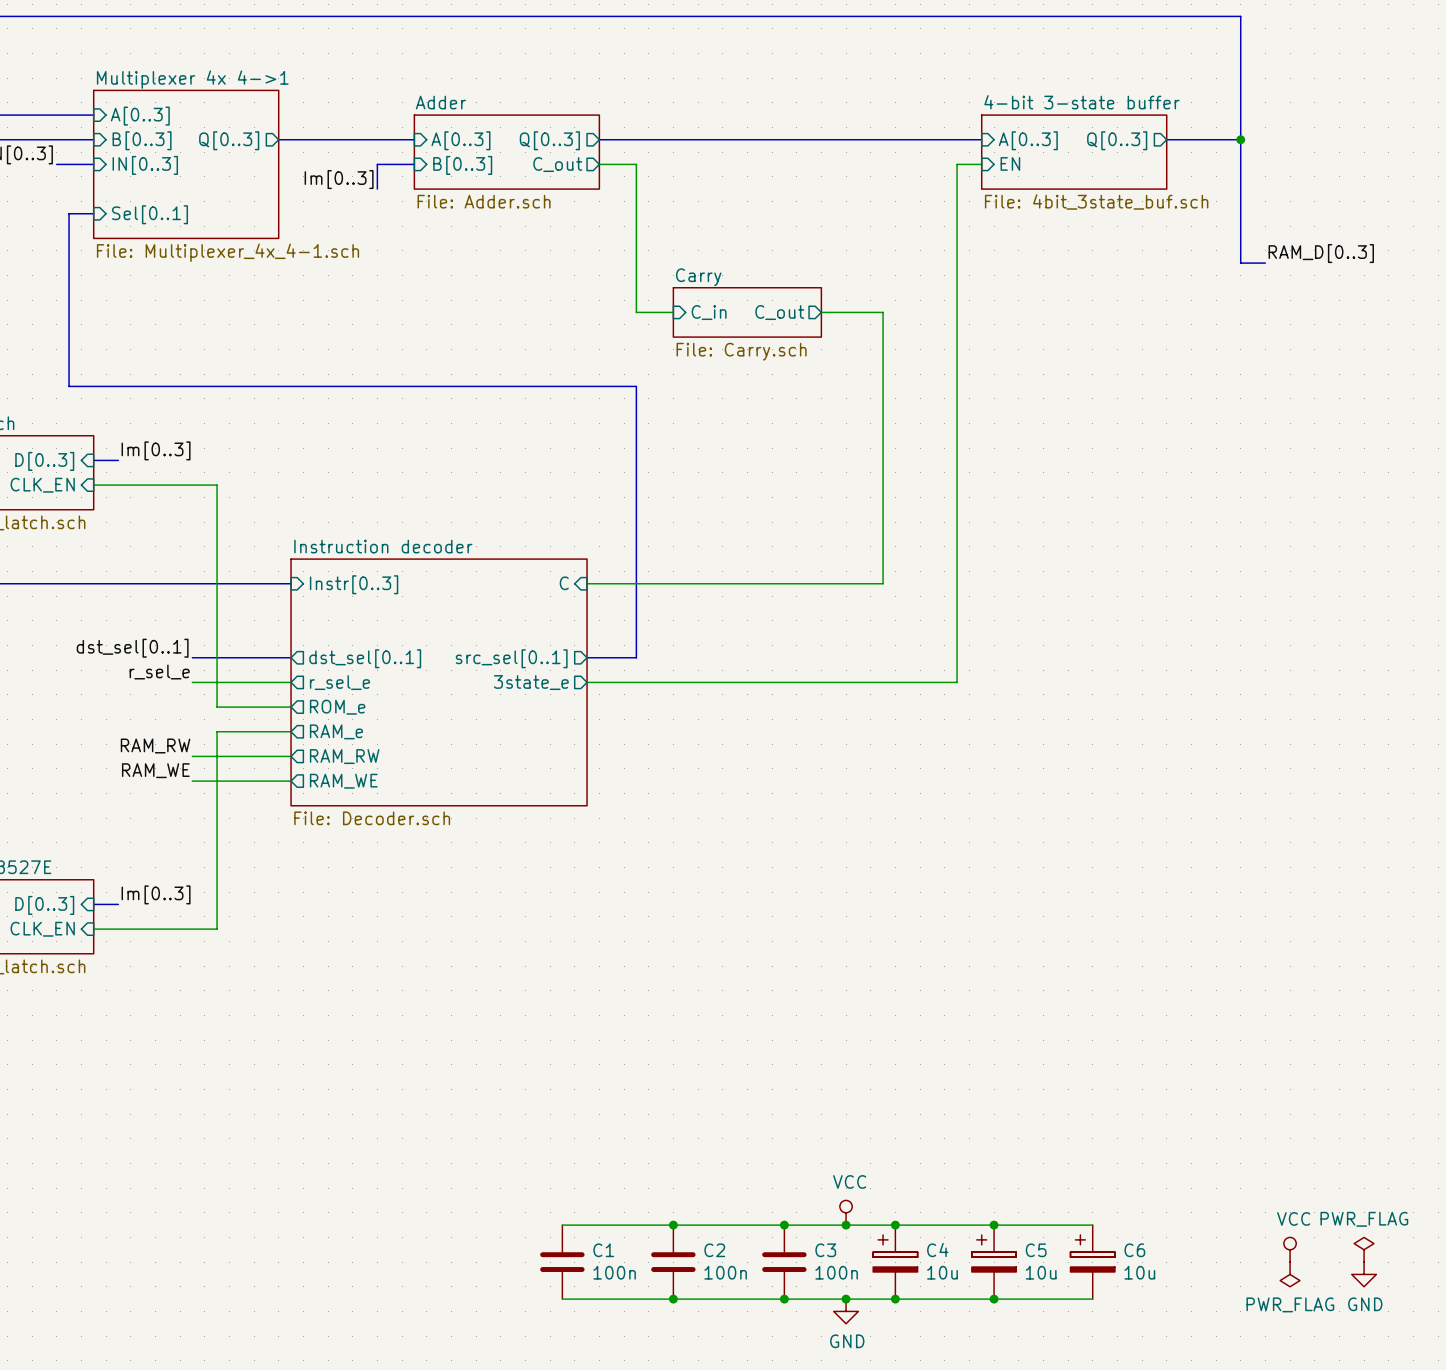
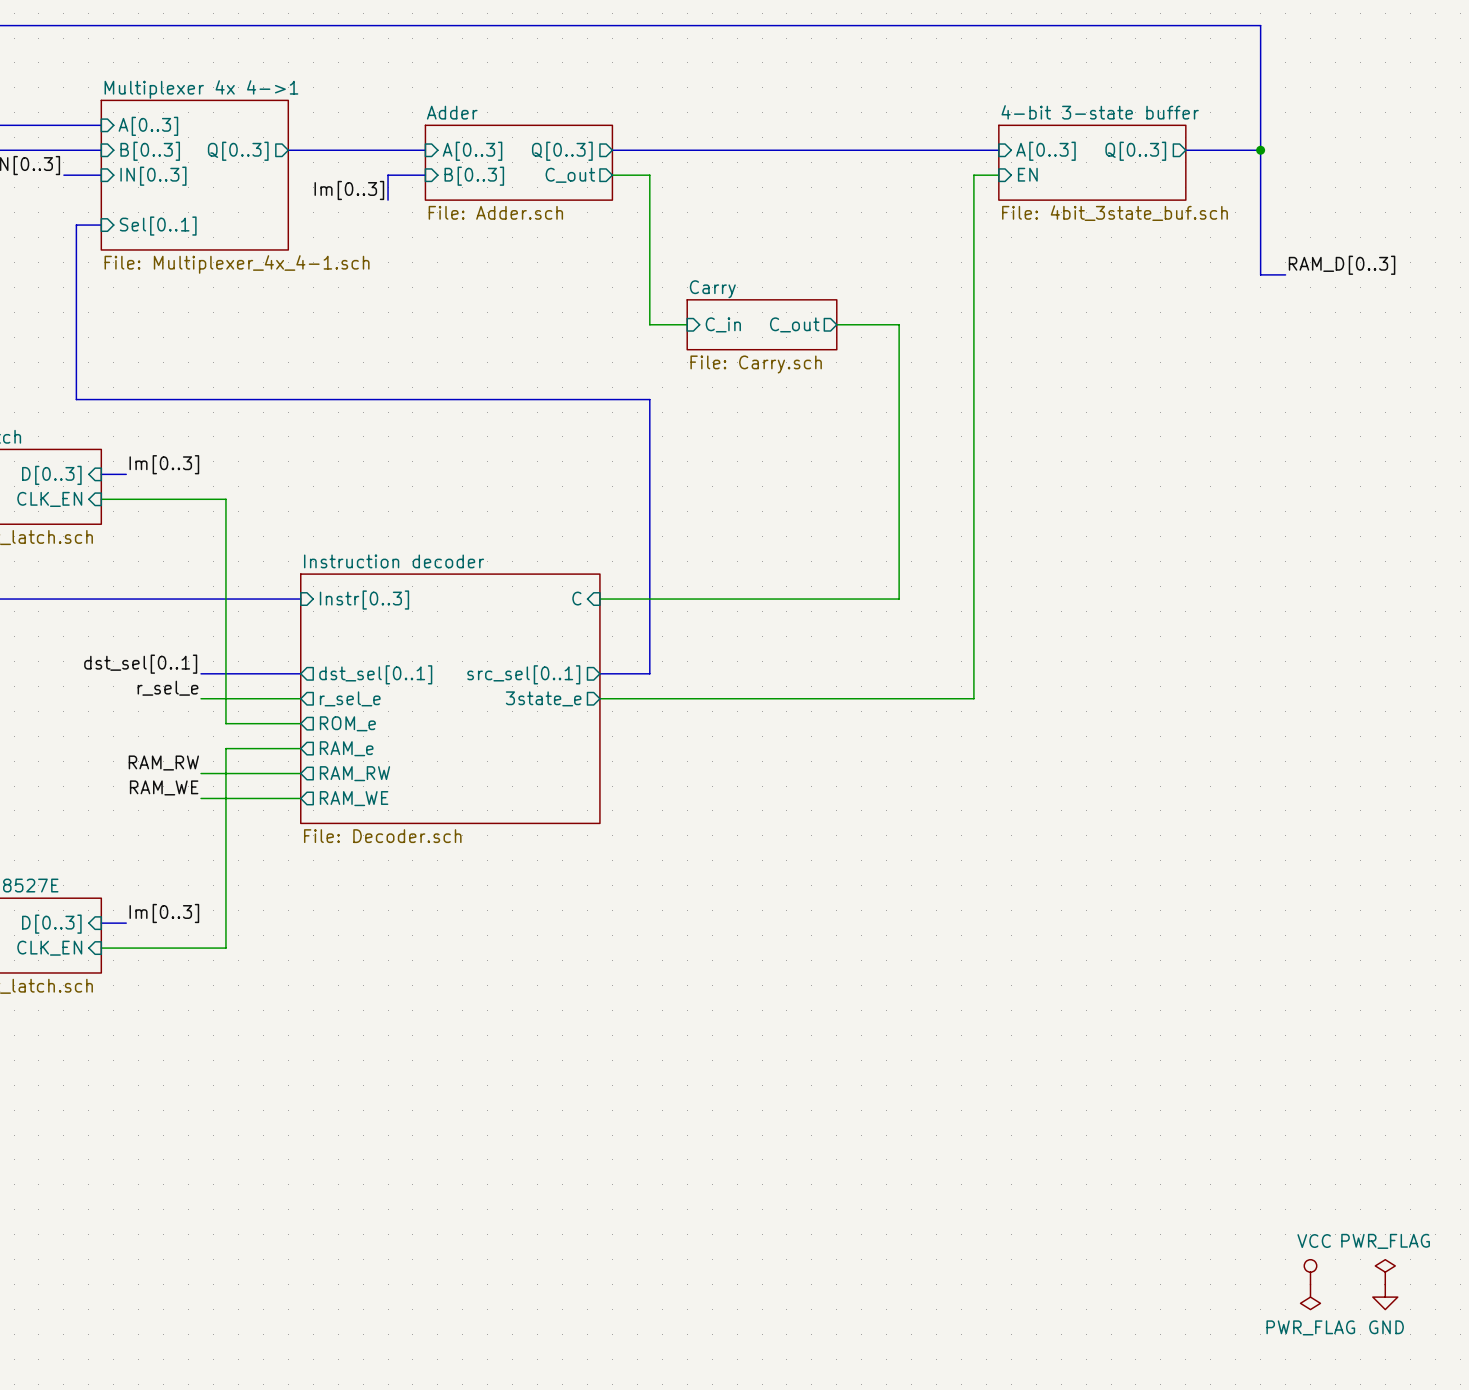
power symbol: VCC (846, 1212) -> none
wire: (562, 1225) (1092, 1225) -> none
junction: (673, 1225) -> none
junction: (784, 1225) -> none
junction: (846, 1225) -> none
junction: (895, 1225) -> none
junction: (994, 1225) -> none
C1: 100n (562, 1262) -> none
C2: 100n (673, 1262) -> none
C3: 100n (784, 1262) -> none
C4: 10u (895, 1262) -> none
C5: 10u (994, 1262) -> none
C6: 10u (1092, 1262) -> none
wire: (562, 1299) (1092, 1299) -> none
junction: (673, 1299) -> none
junction: (784, 1299) -> none
junction: (846, 1299) -> none
junction: (895, 1299) -> none
junction: (994, 1299) -> none
power symbol: GND (846, 1311) -> none

